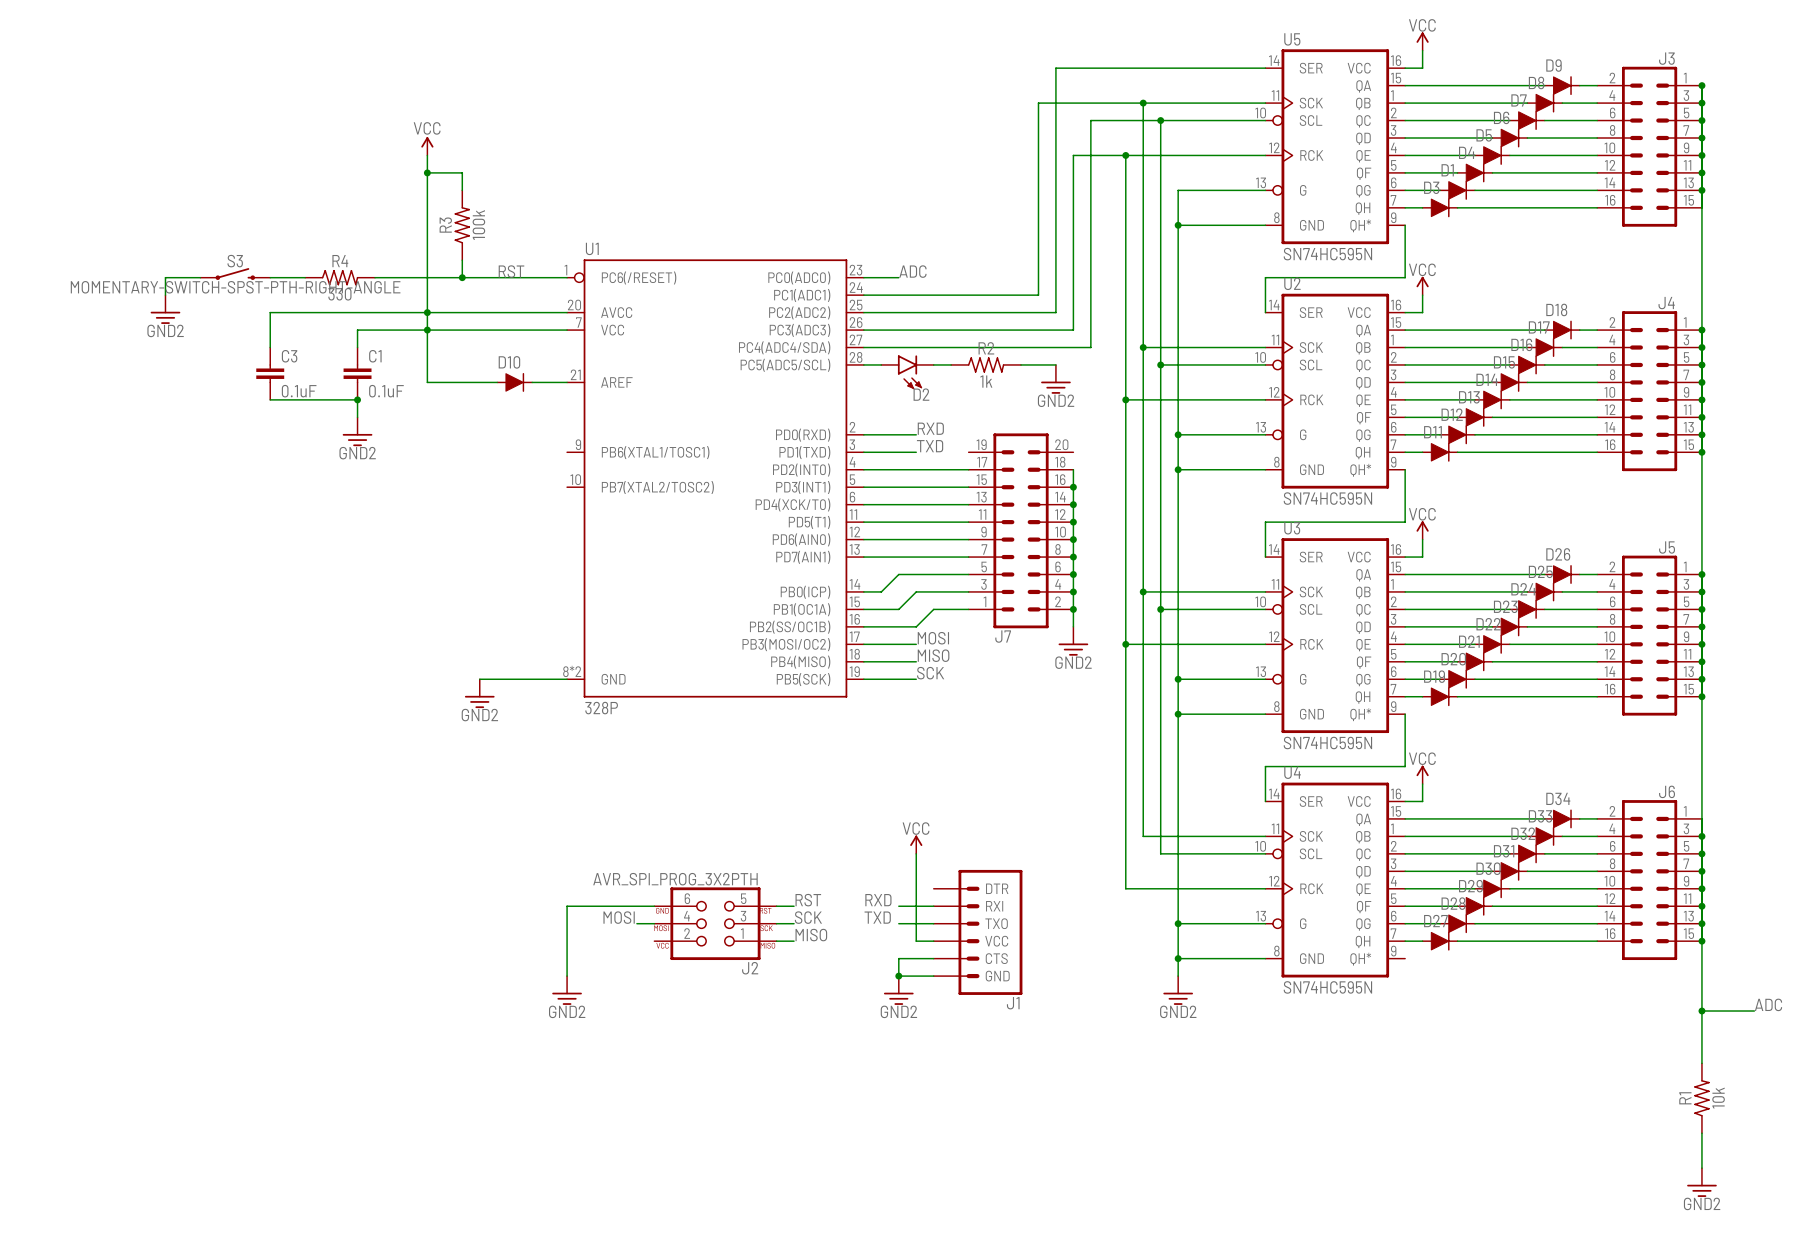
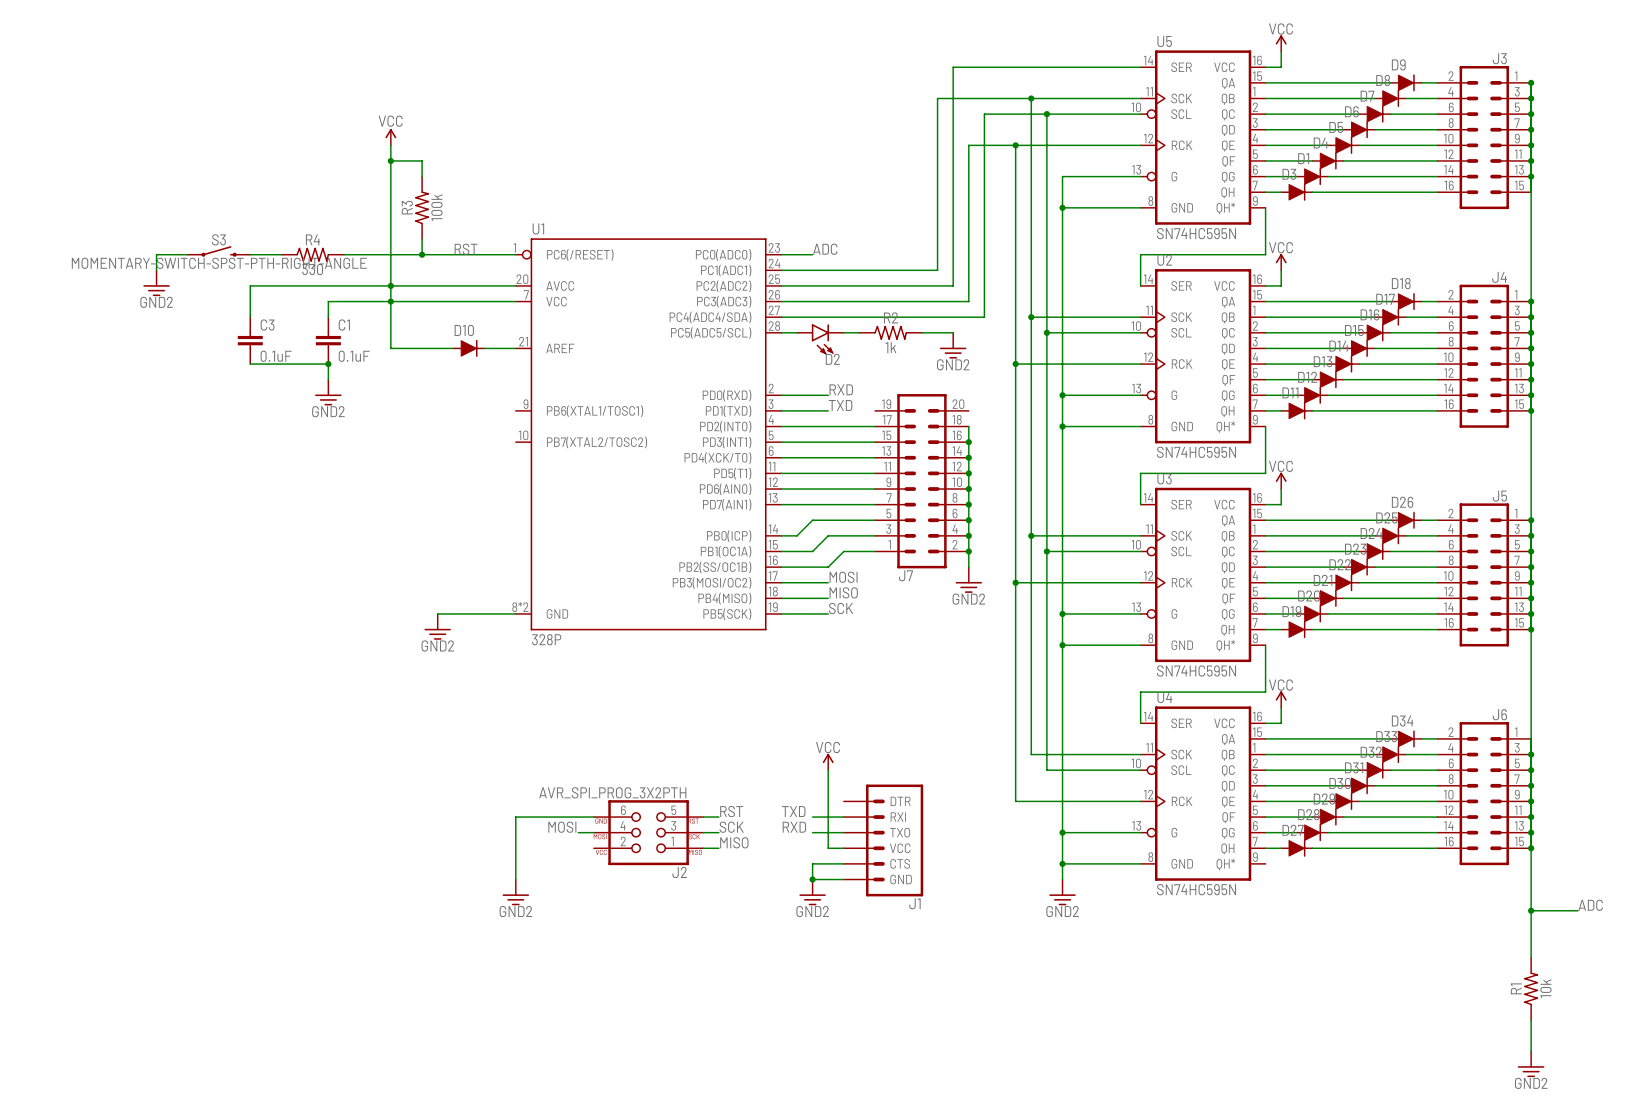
label: RXD (878, 900) -> TXD (793, 811)
label: TXD (877, 917) -> RXD (794, 827)

